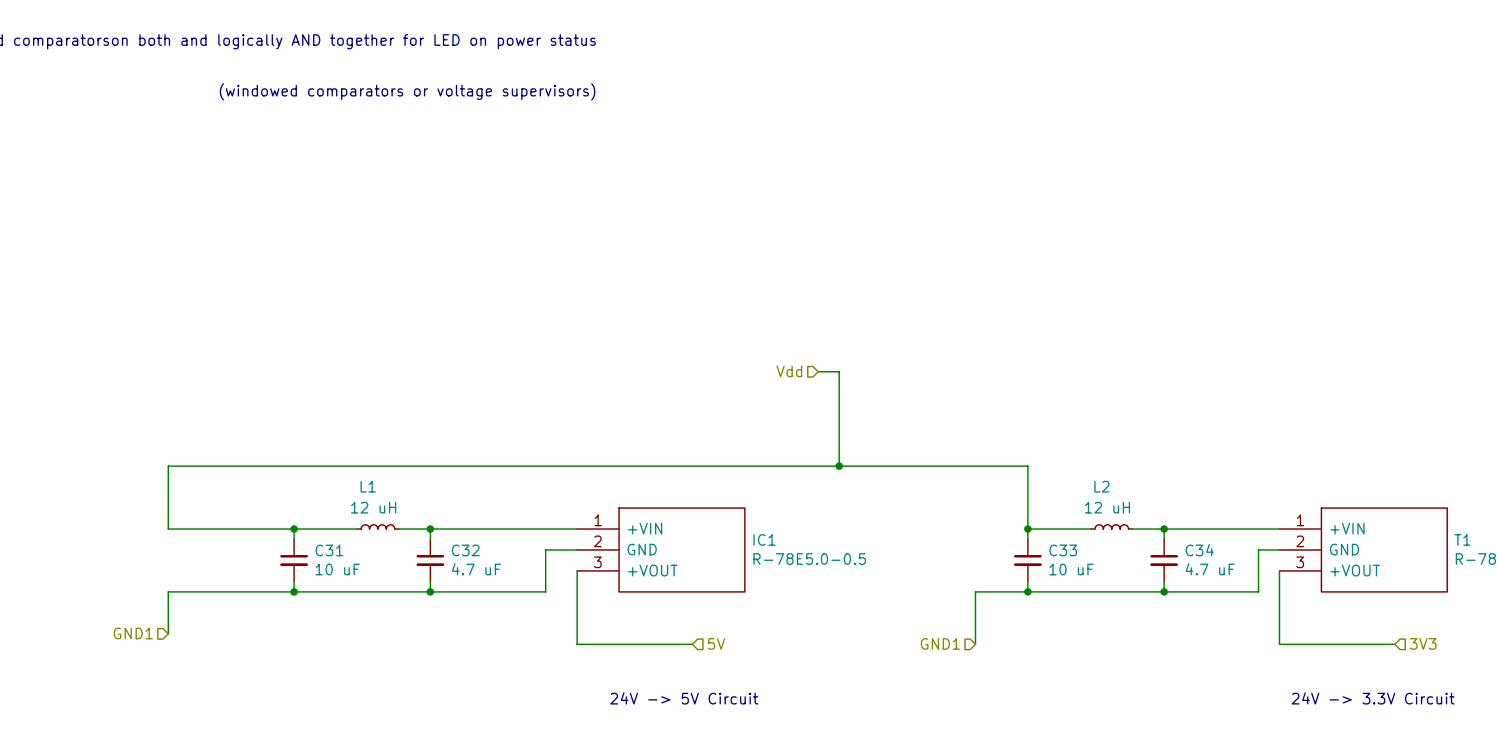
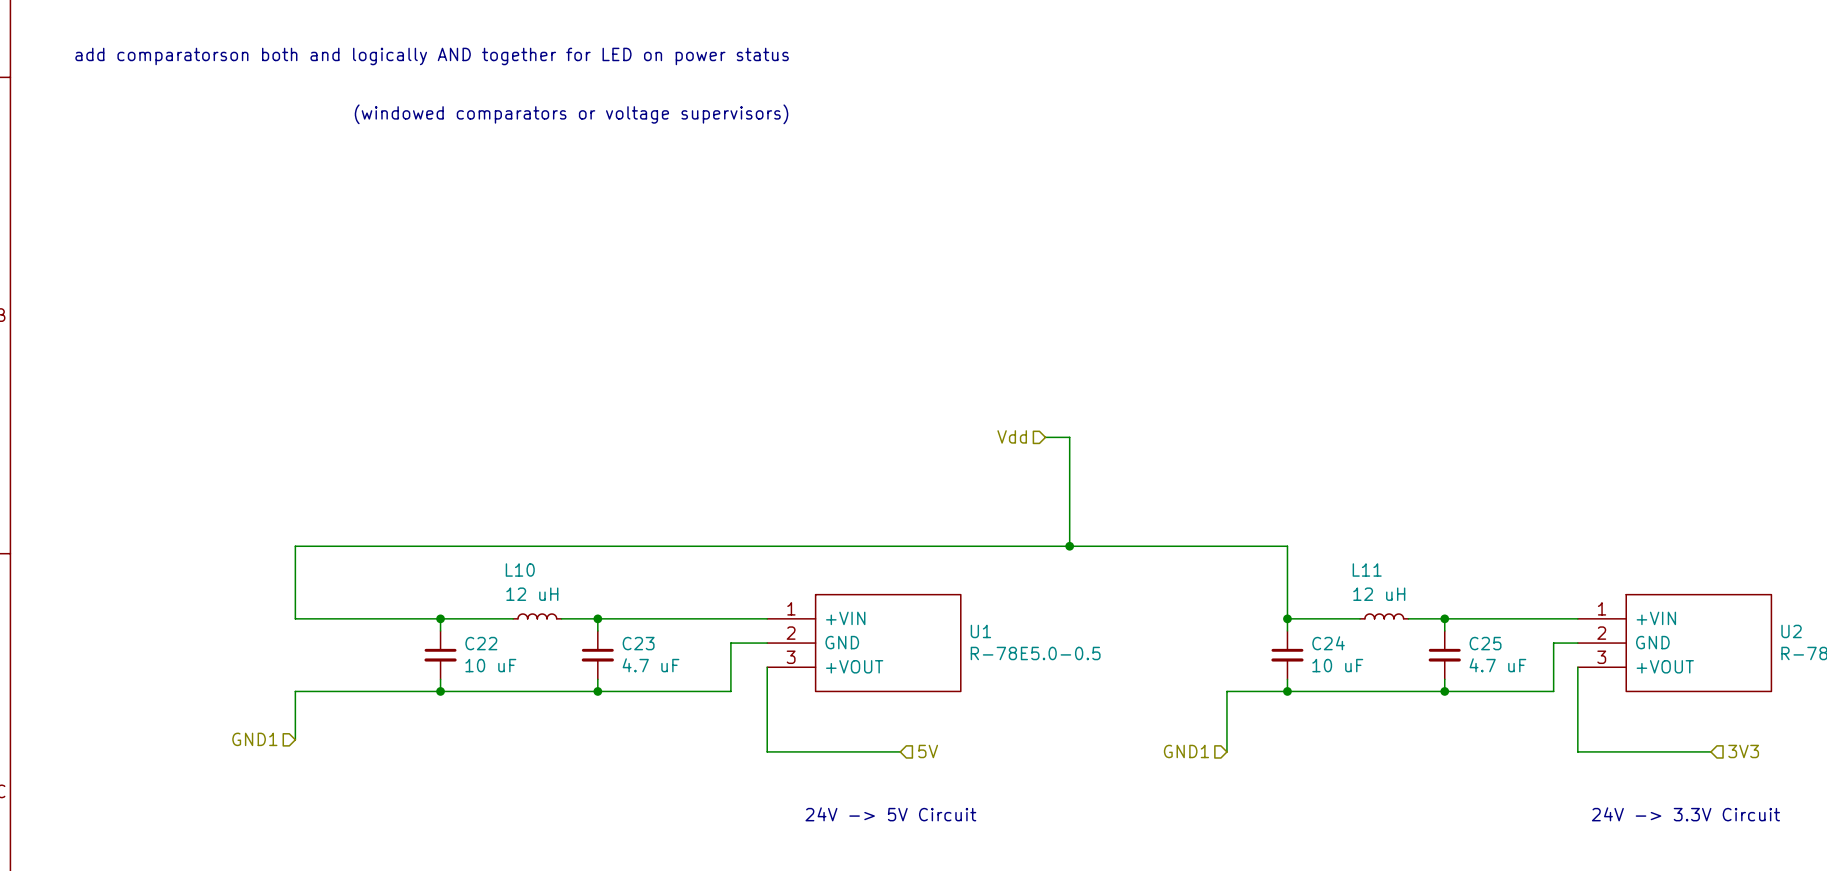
L1 name: L1 (368, 486) -> L10 (520, 570)
L2 name: L2 (1101, 486) -> L11 (1367, 570)
IC1 name: IC1 (764, 539) -> U1 (980, 631)
T1 name: T1 (1462, 539) -> U2 (1791, 631)
C31 name: C31 (329, 550) -> C22 (481, 643)
C32 name: C32 (465, 550) -> C23 (638, 643)
C33 name: C33 (1063, 550) -> C24 (1328, 643)
C34 name: C34 (1199, 550) -> C25 (1485, 643)

